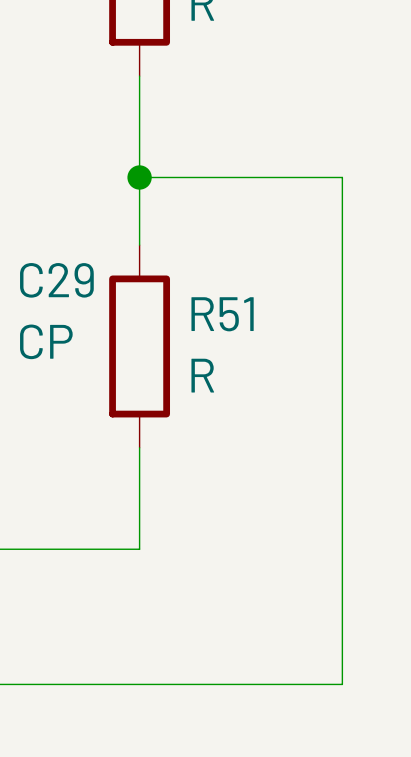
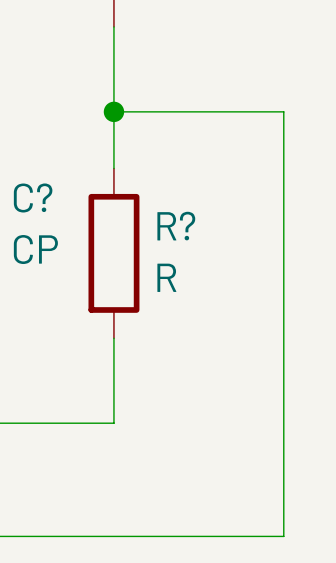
C29 name: C29 (56, 280) -> C? (33, 197)
R51 name: R51 (222, 314) -> R? (176, 226)

